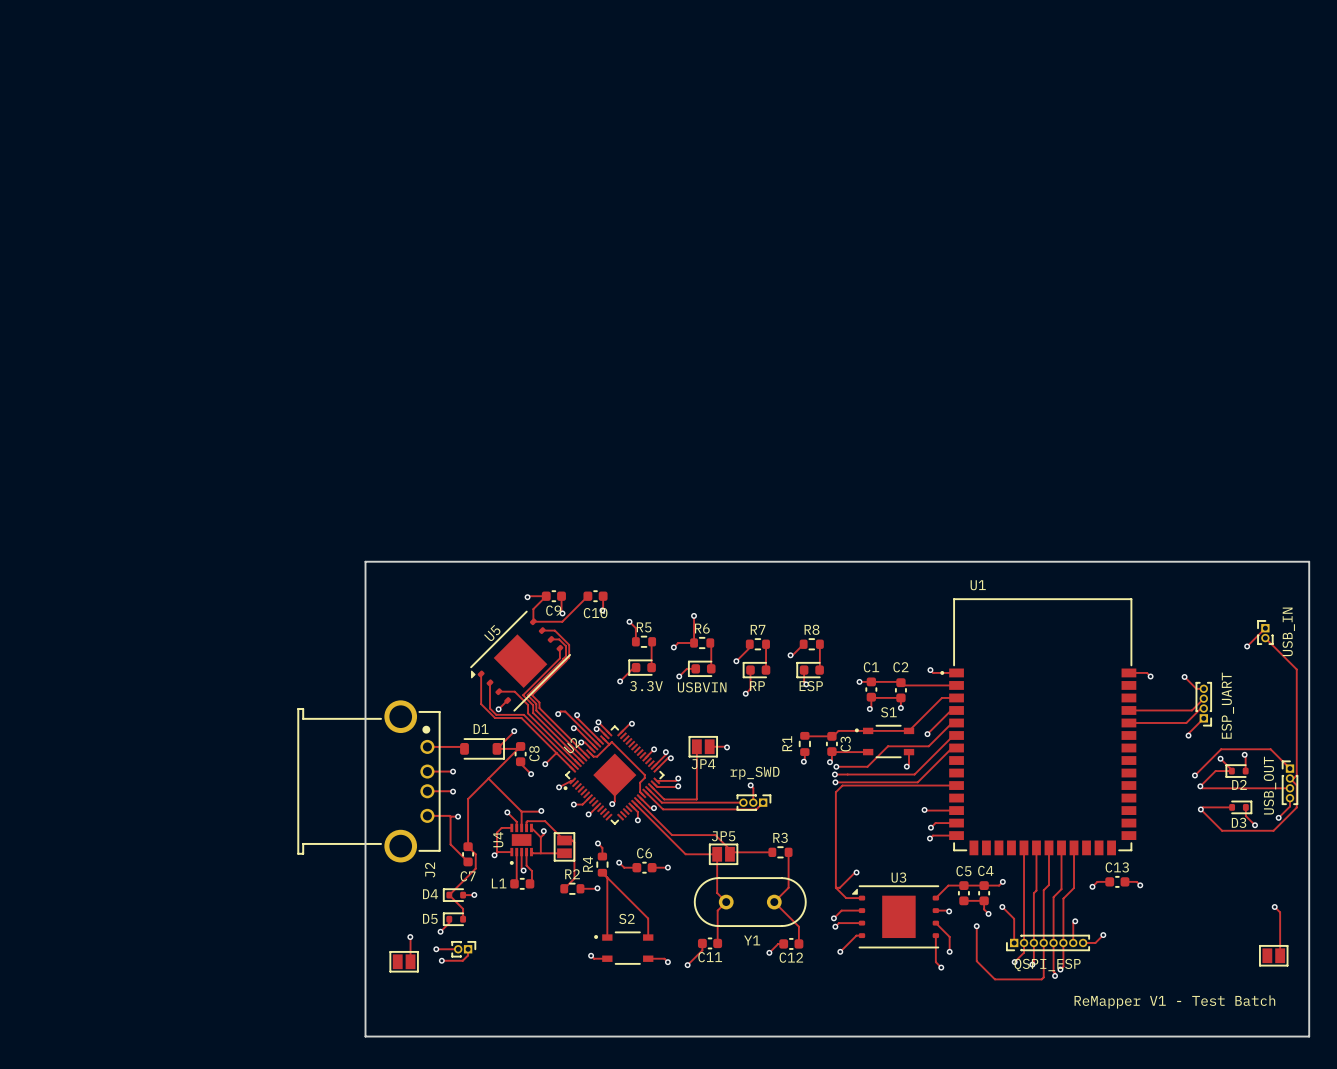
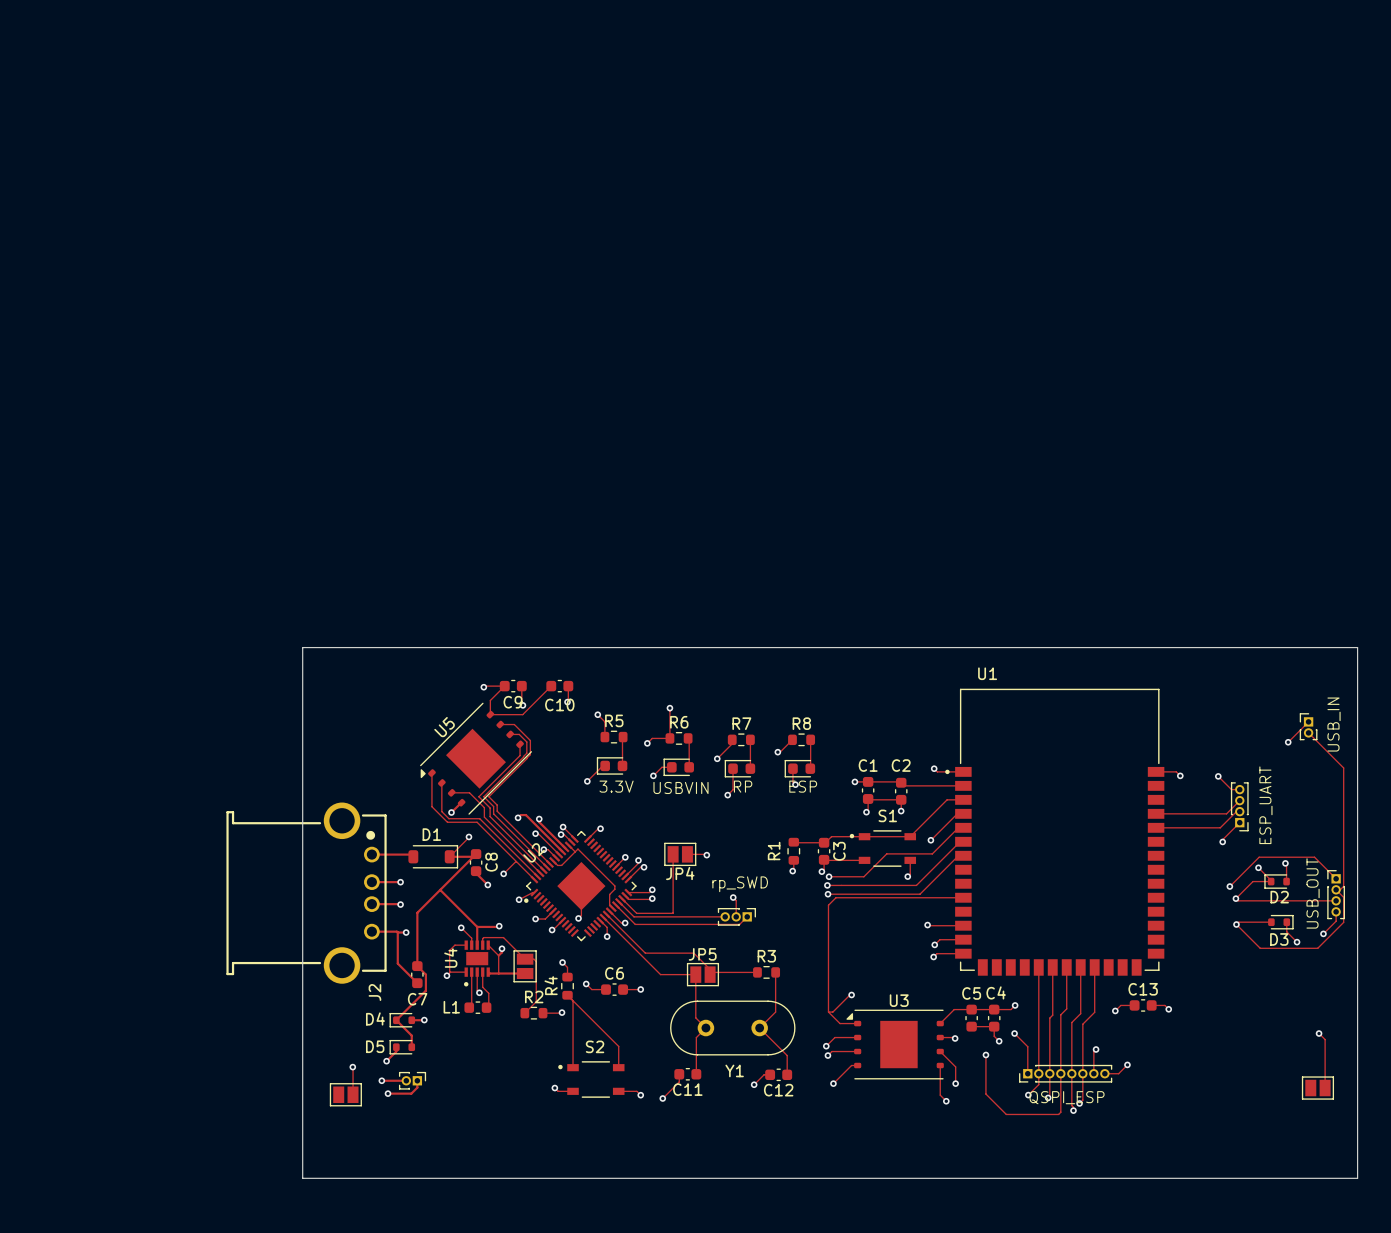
text: ReMapper V1 - Test Batch (1174, 1001) -> none

